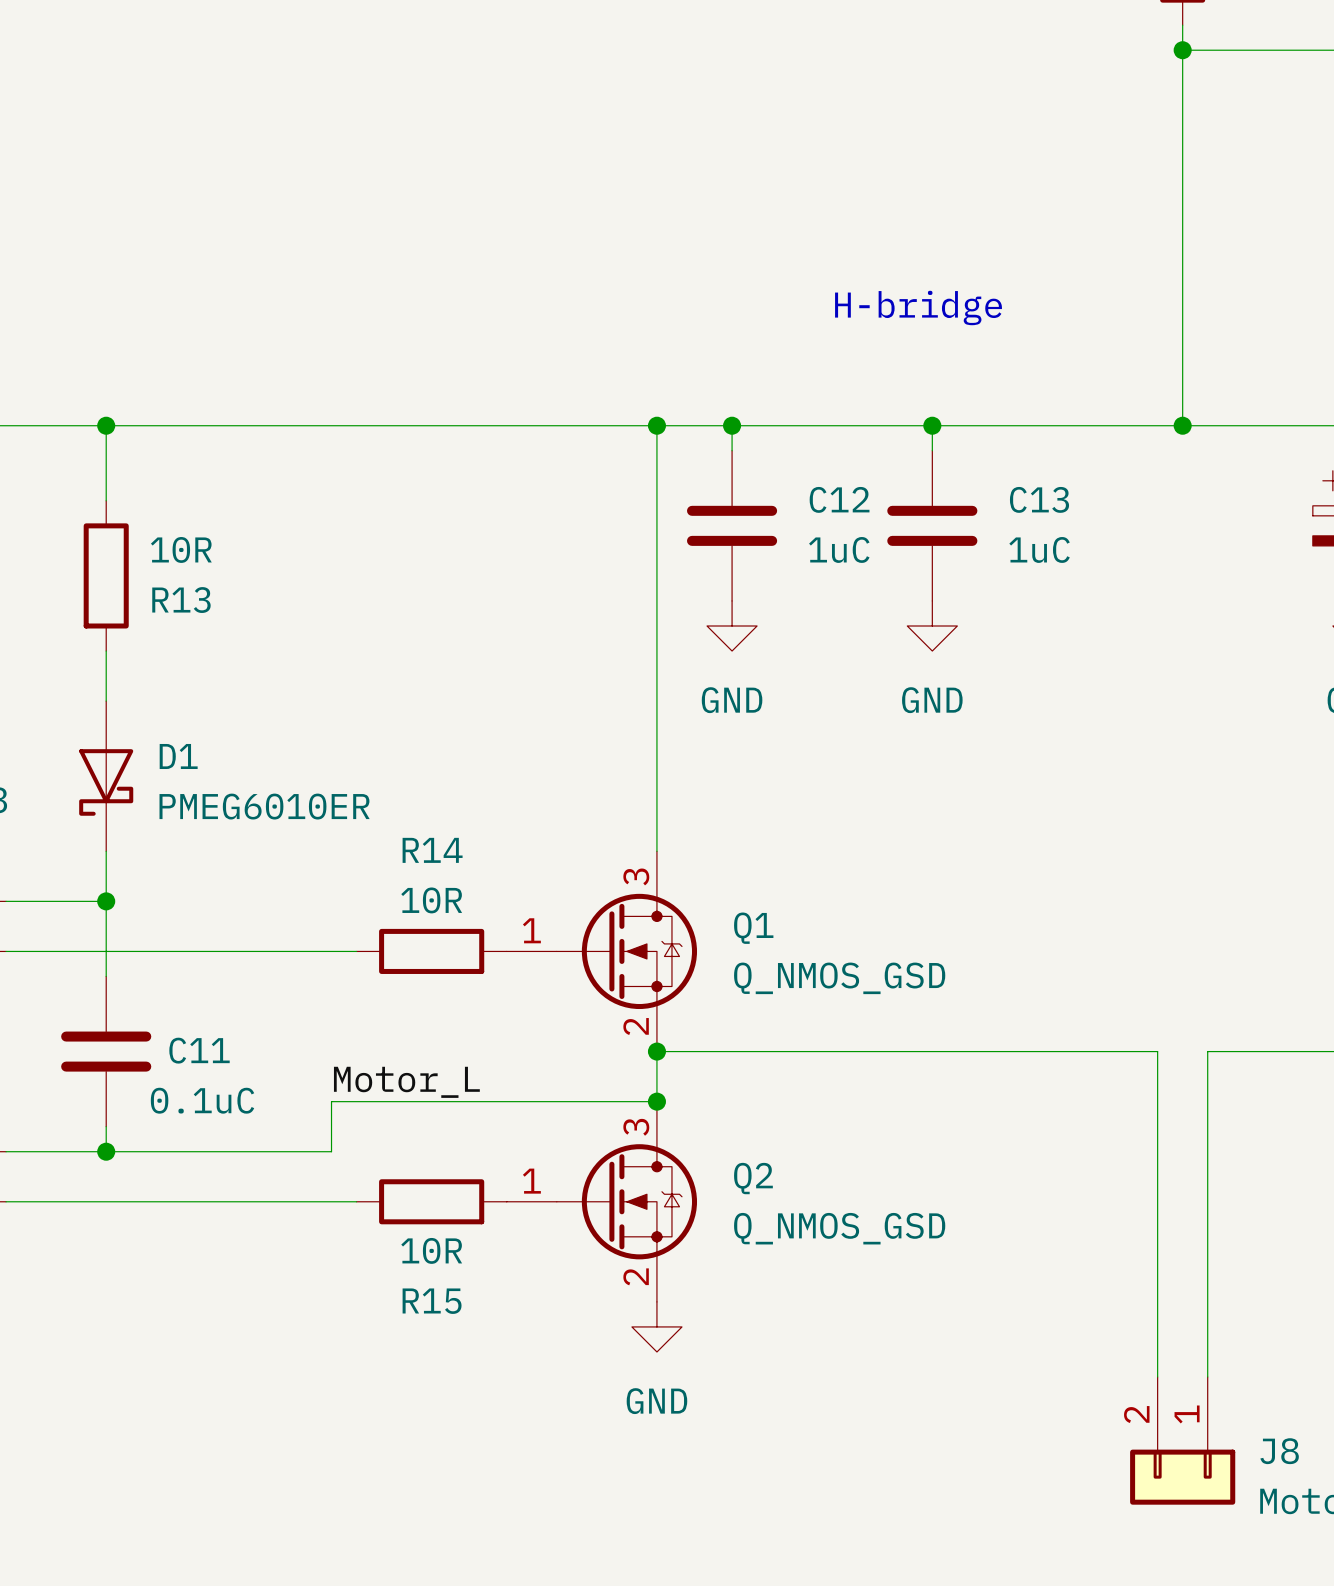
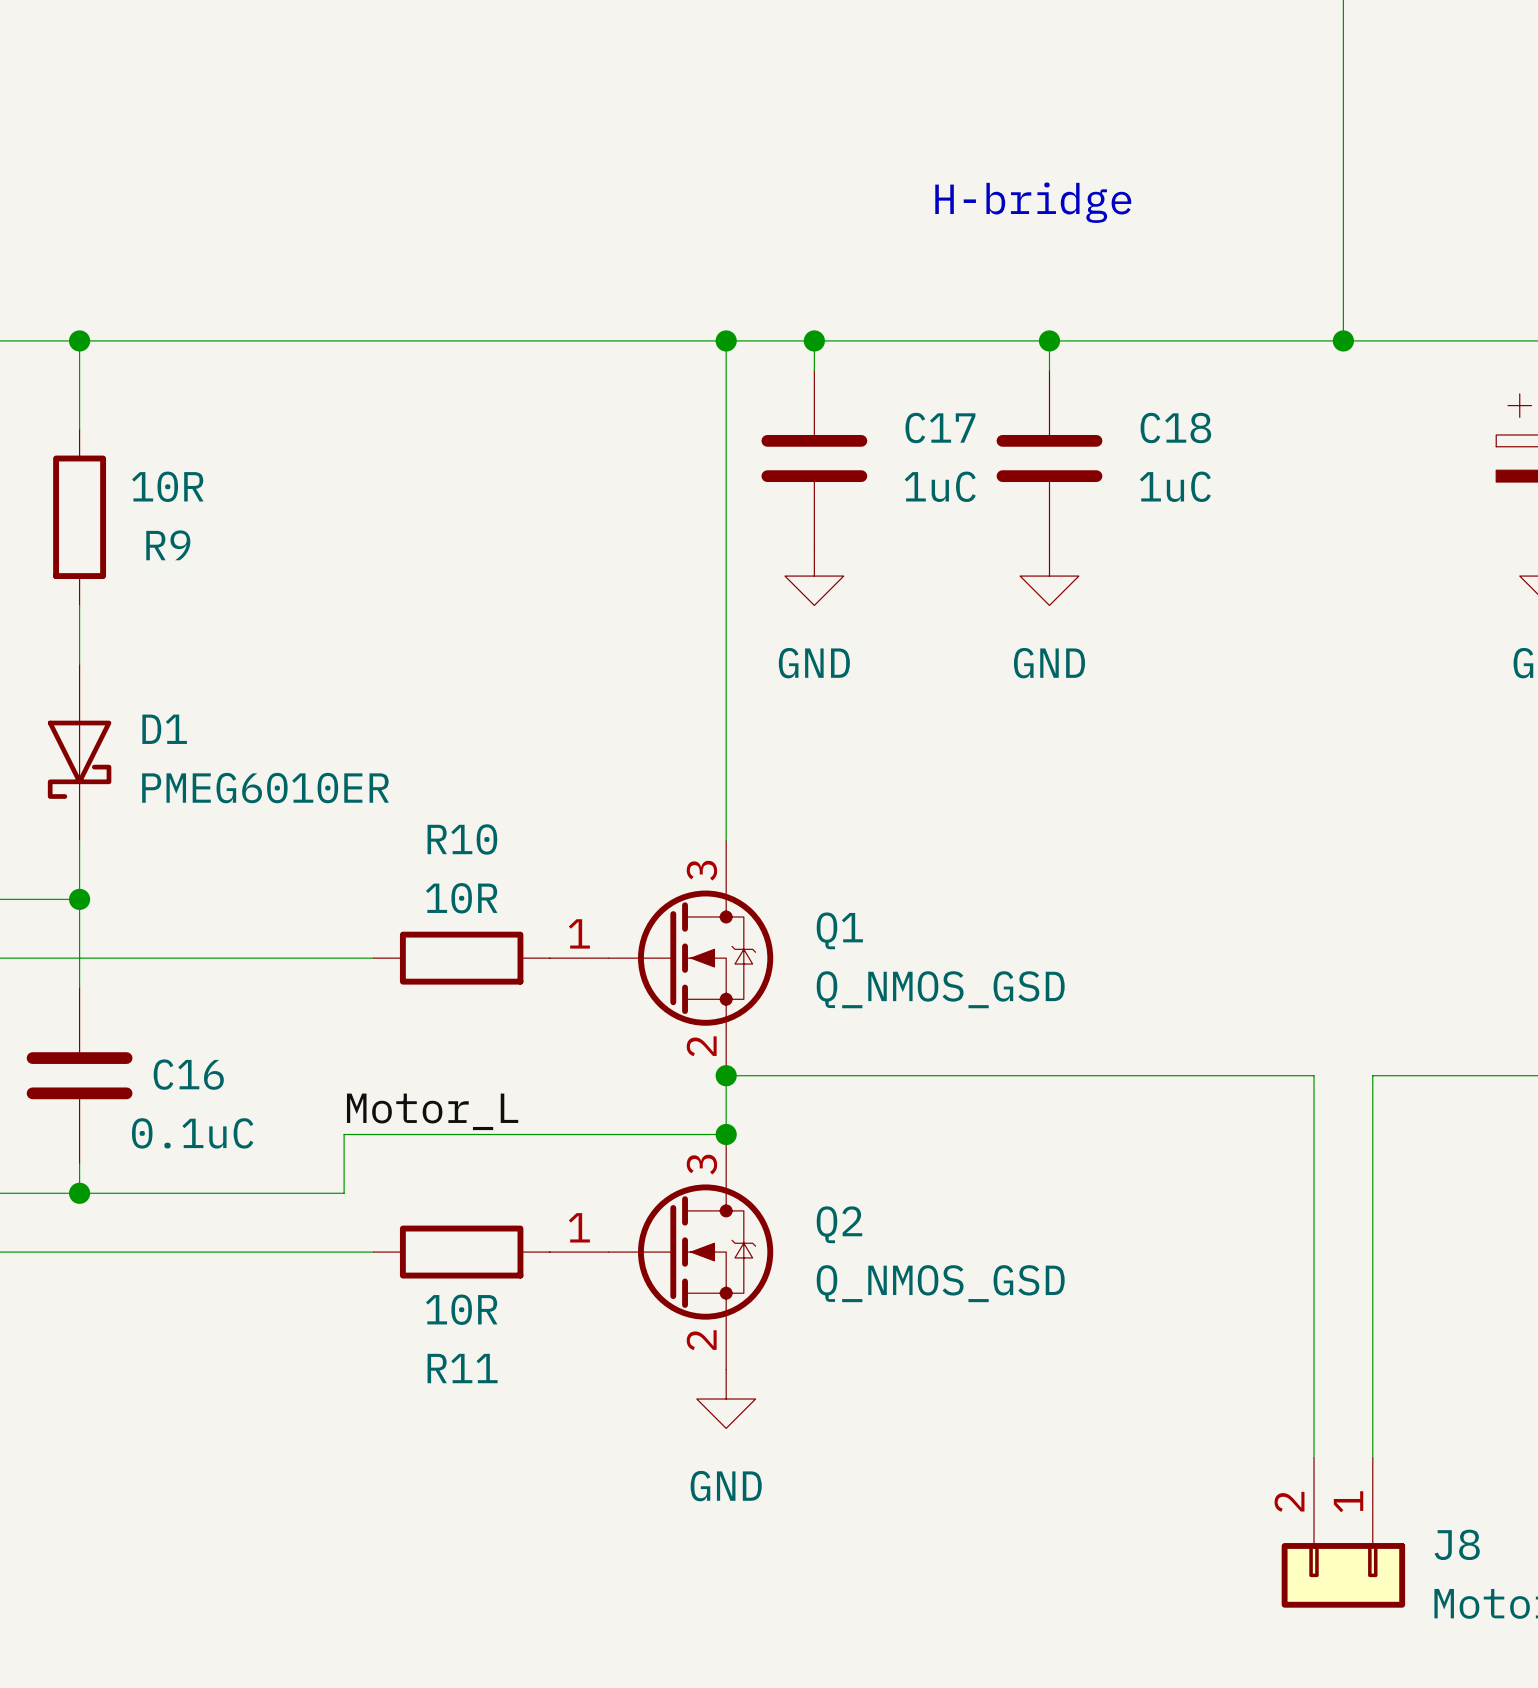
C12 name: C12 (839, 499) -> C17 (940, 428)
C13 name: C13 (1039, 499) -> C18 (1175, 428)
R13 name: R13 (181, 600) -> R9 (168, 545)
R14 name: R14 (432, 850) -> R10 (462, 839)
C11 name: C11 (199, 1050) -> C16 (188, 1074)
R15 name: R15 (432, 1301) -> R11 (462, 1368)

